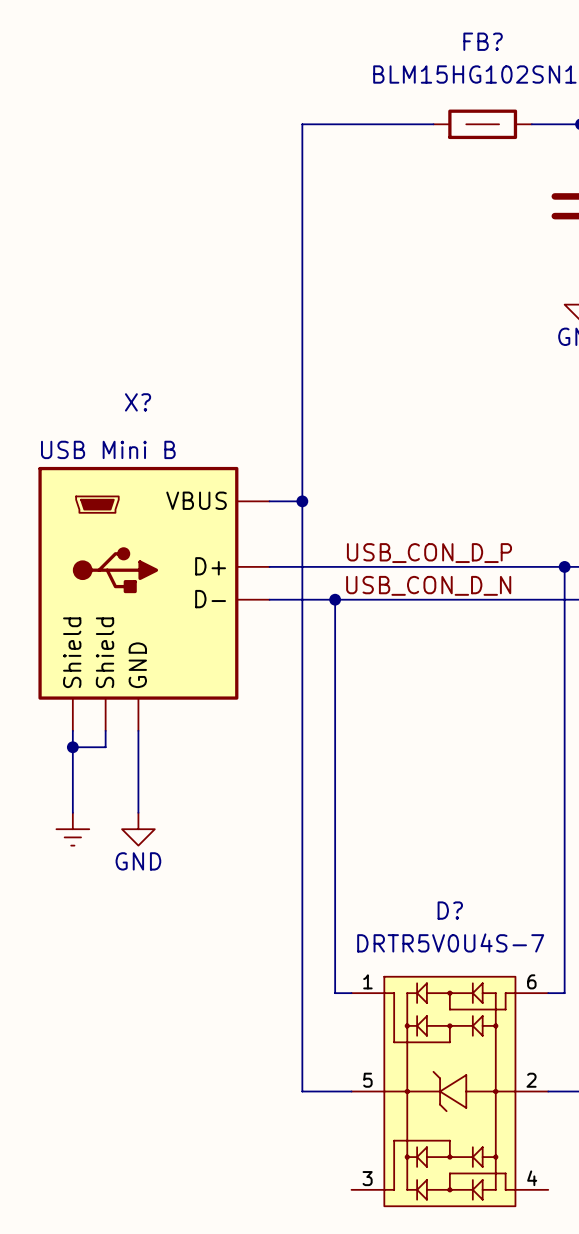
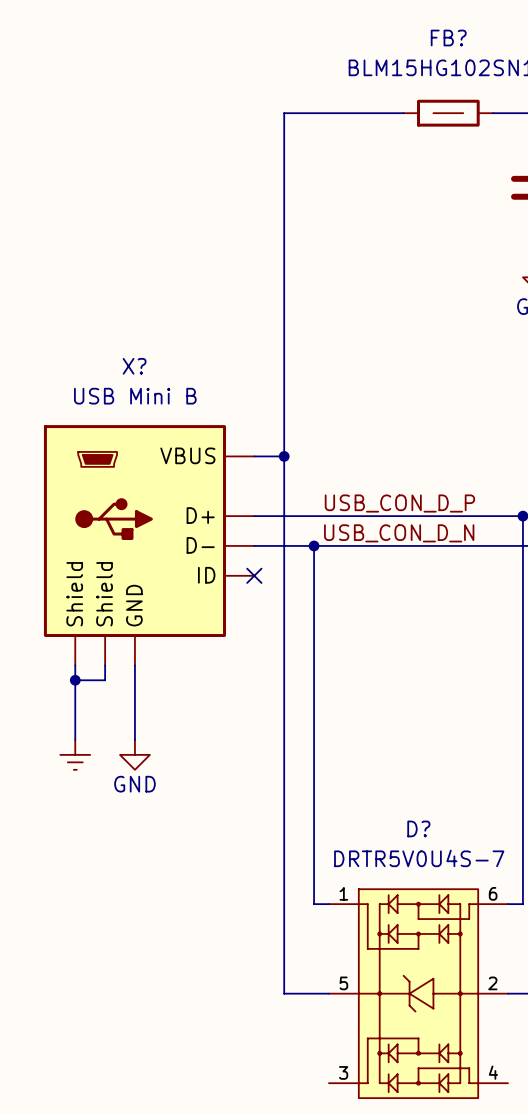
X? symbol: [38, 466, 270, 731] -> [43, 425, 255, 666]
no-connect mark: none -> (254, 575)

